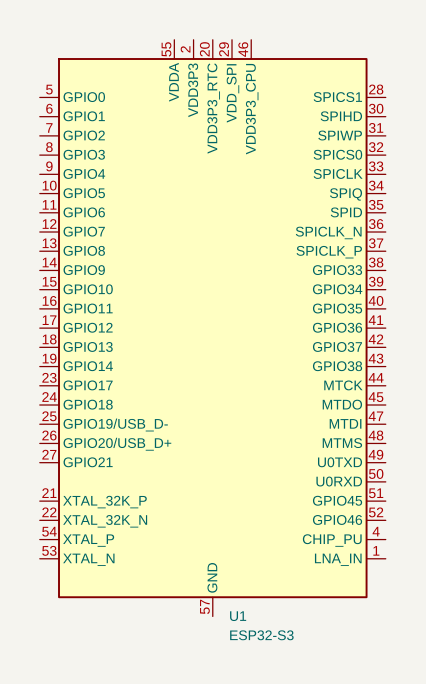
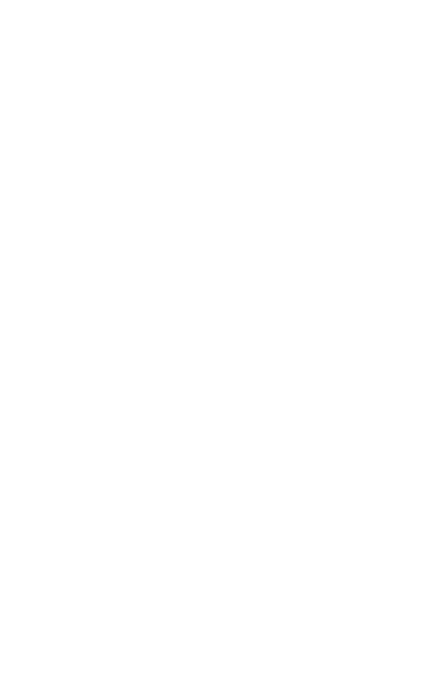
U1: ESP32-S3 (212, 328) -> none

